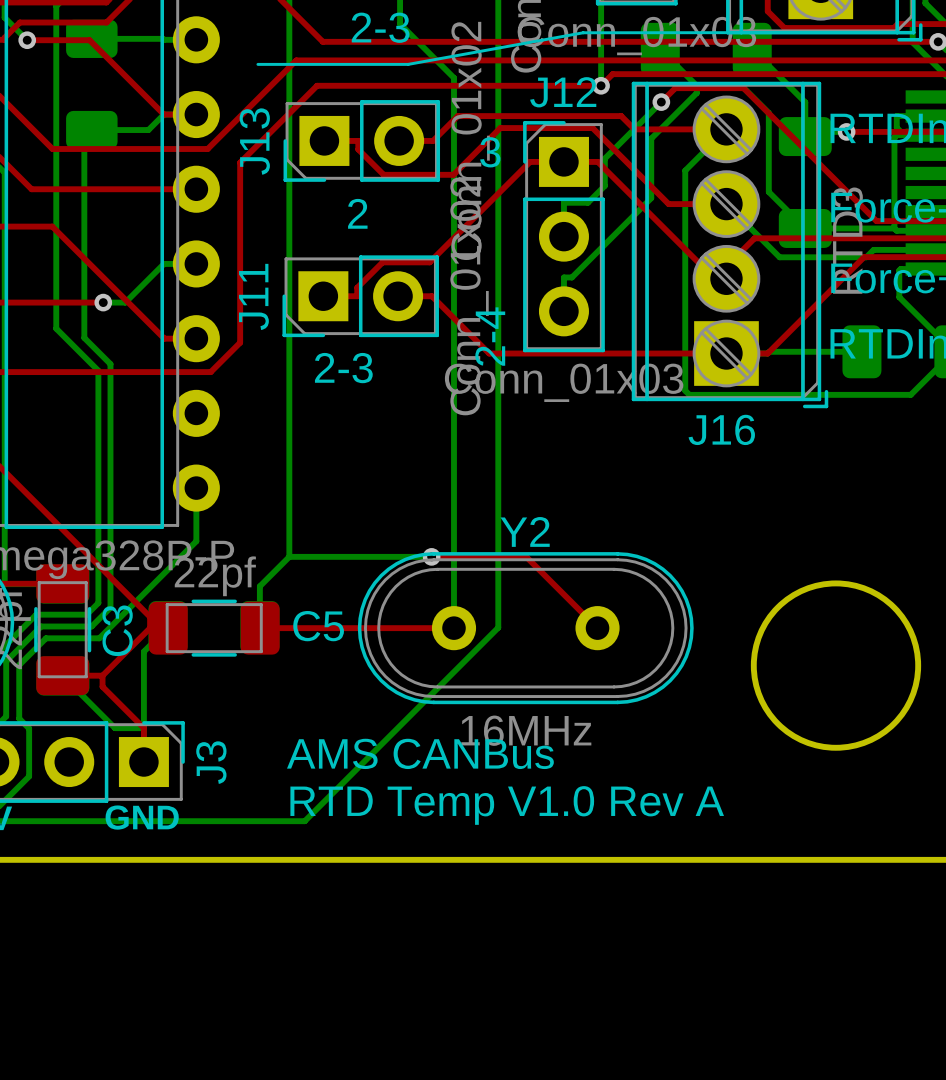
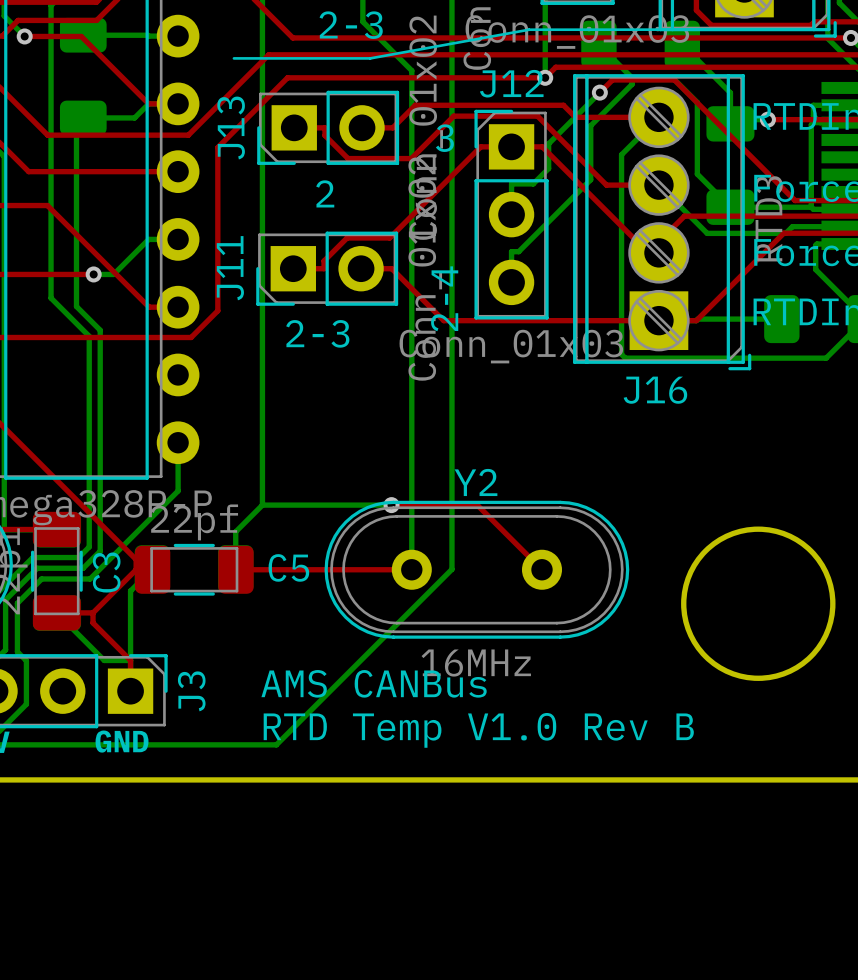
text: RTD Temp V1.0 Rev A (507, 805) -> RTD Temp V1.0 Rev B (478, 730)

